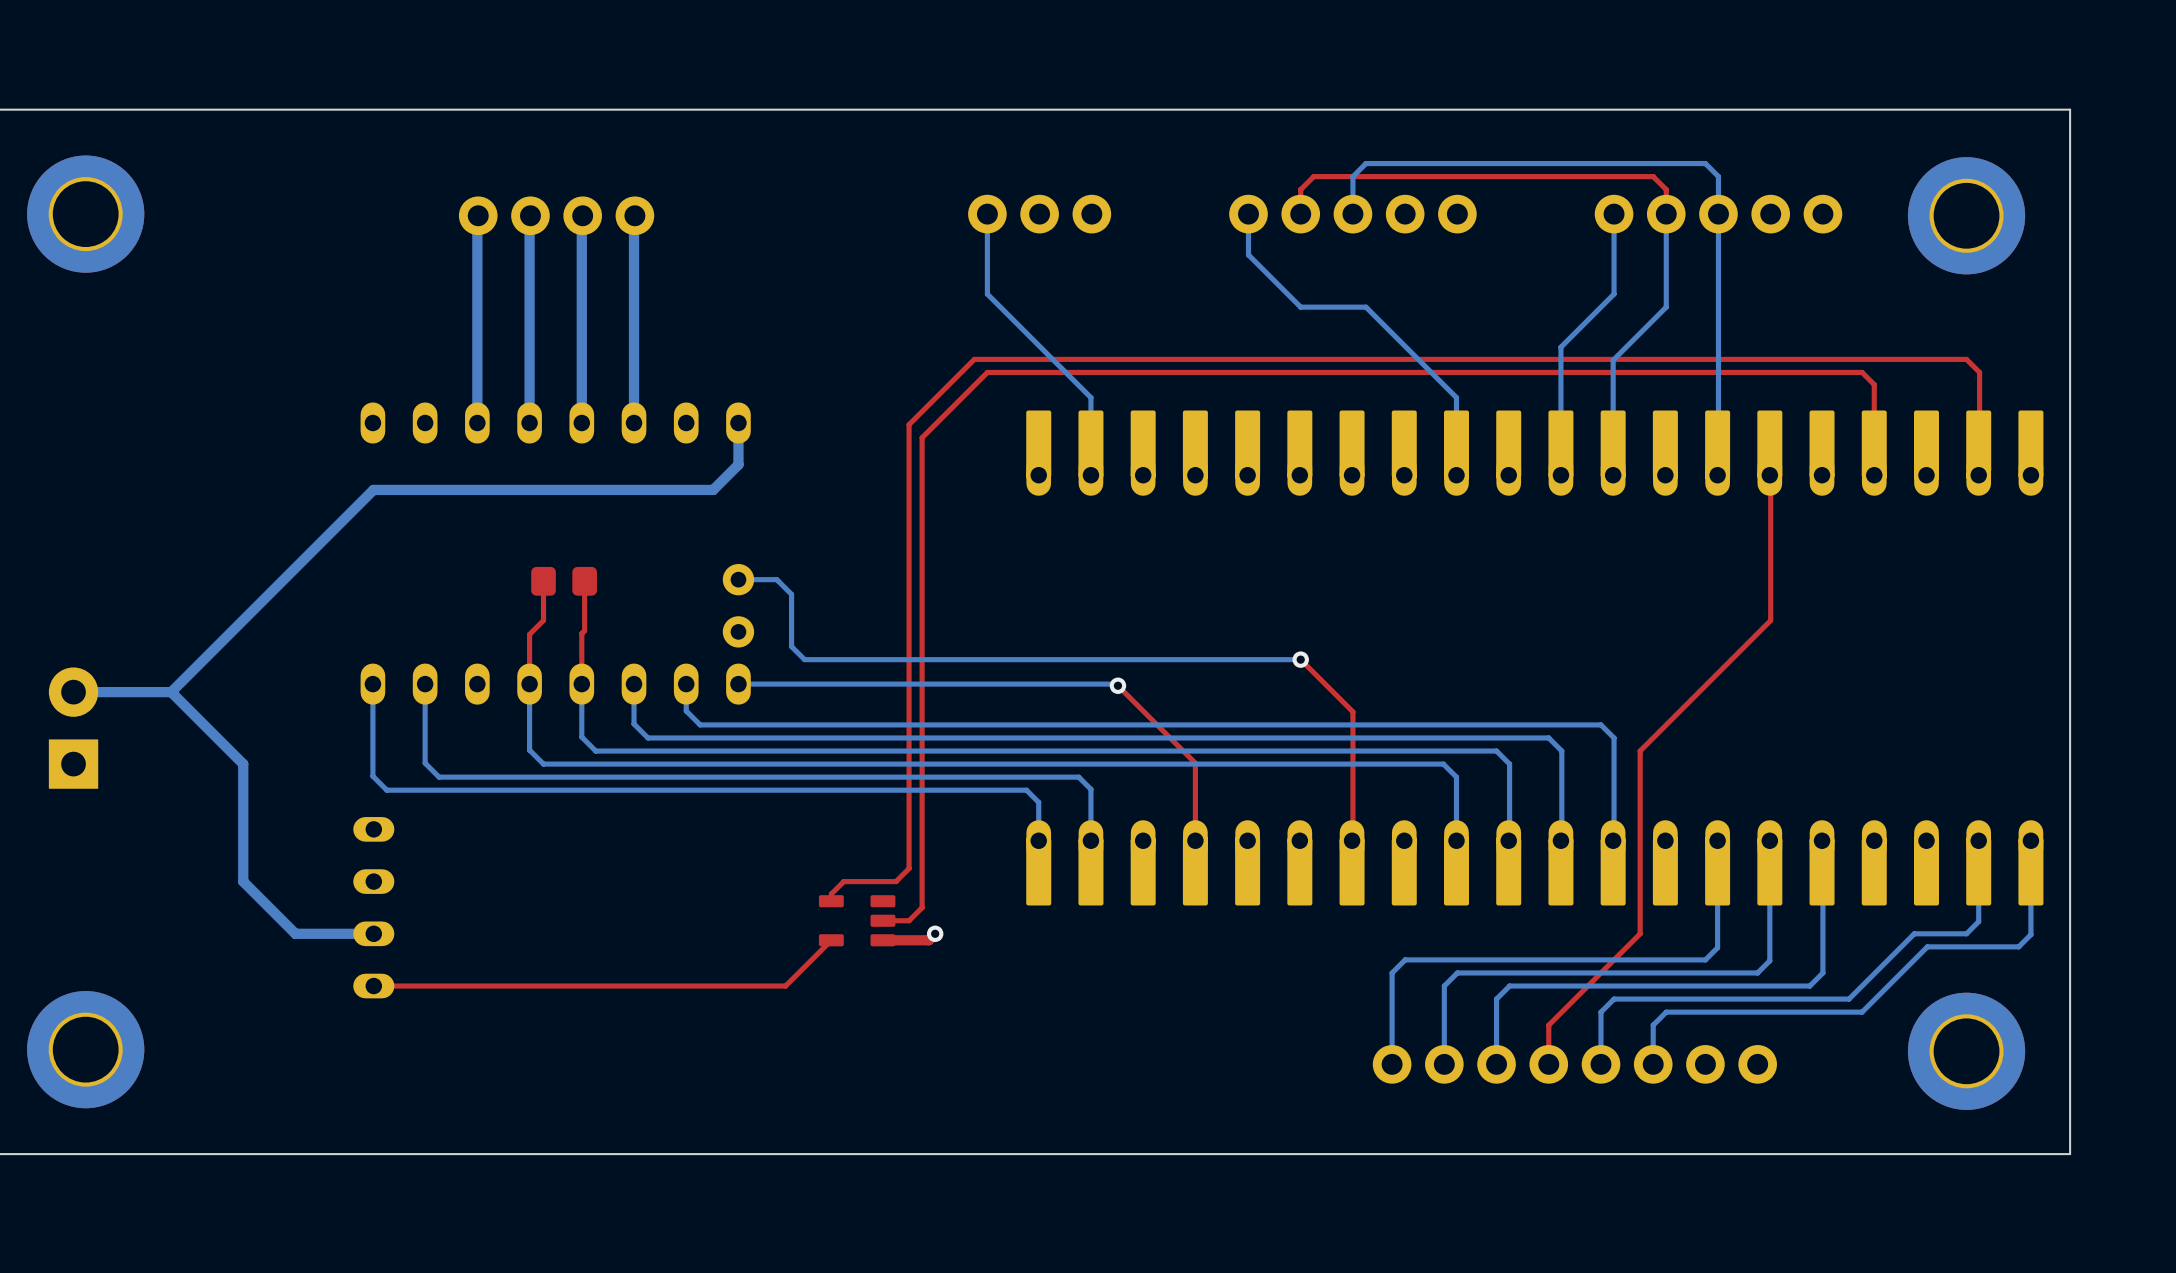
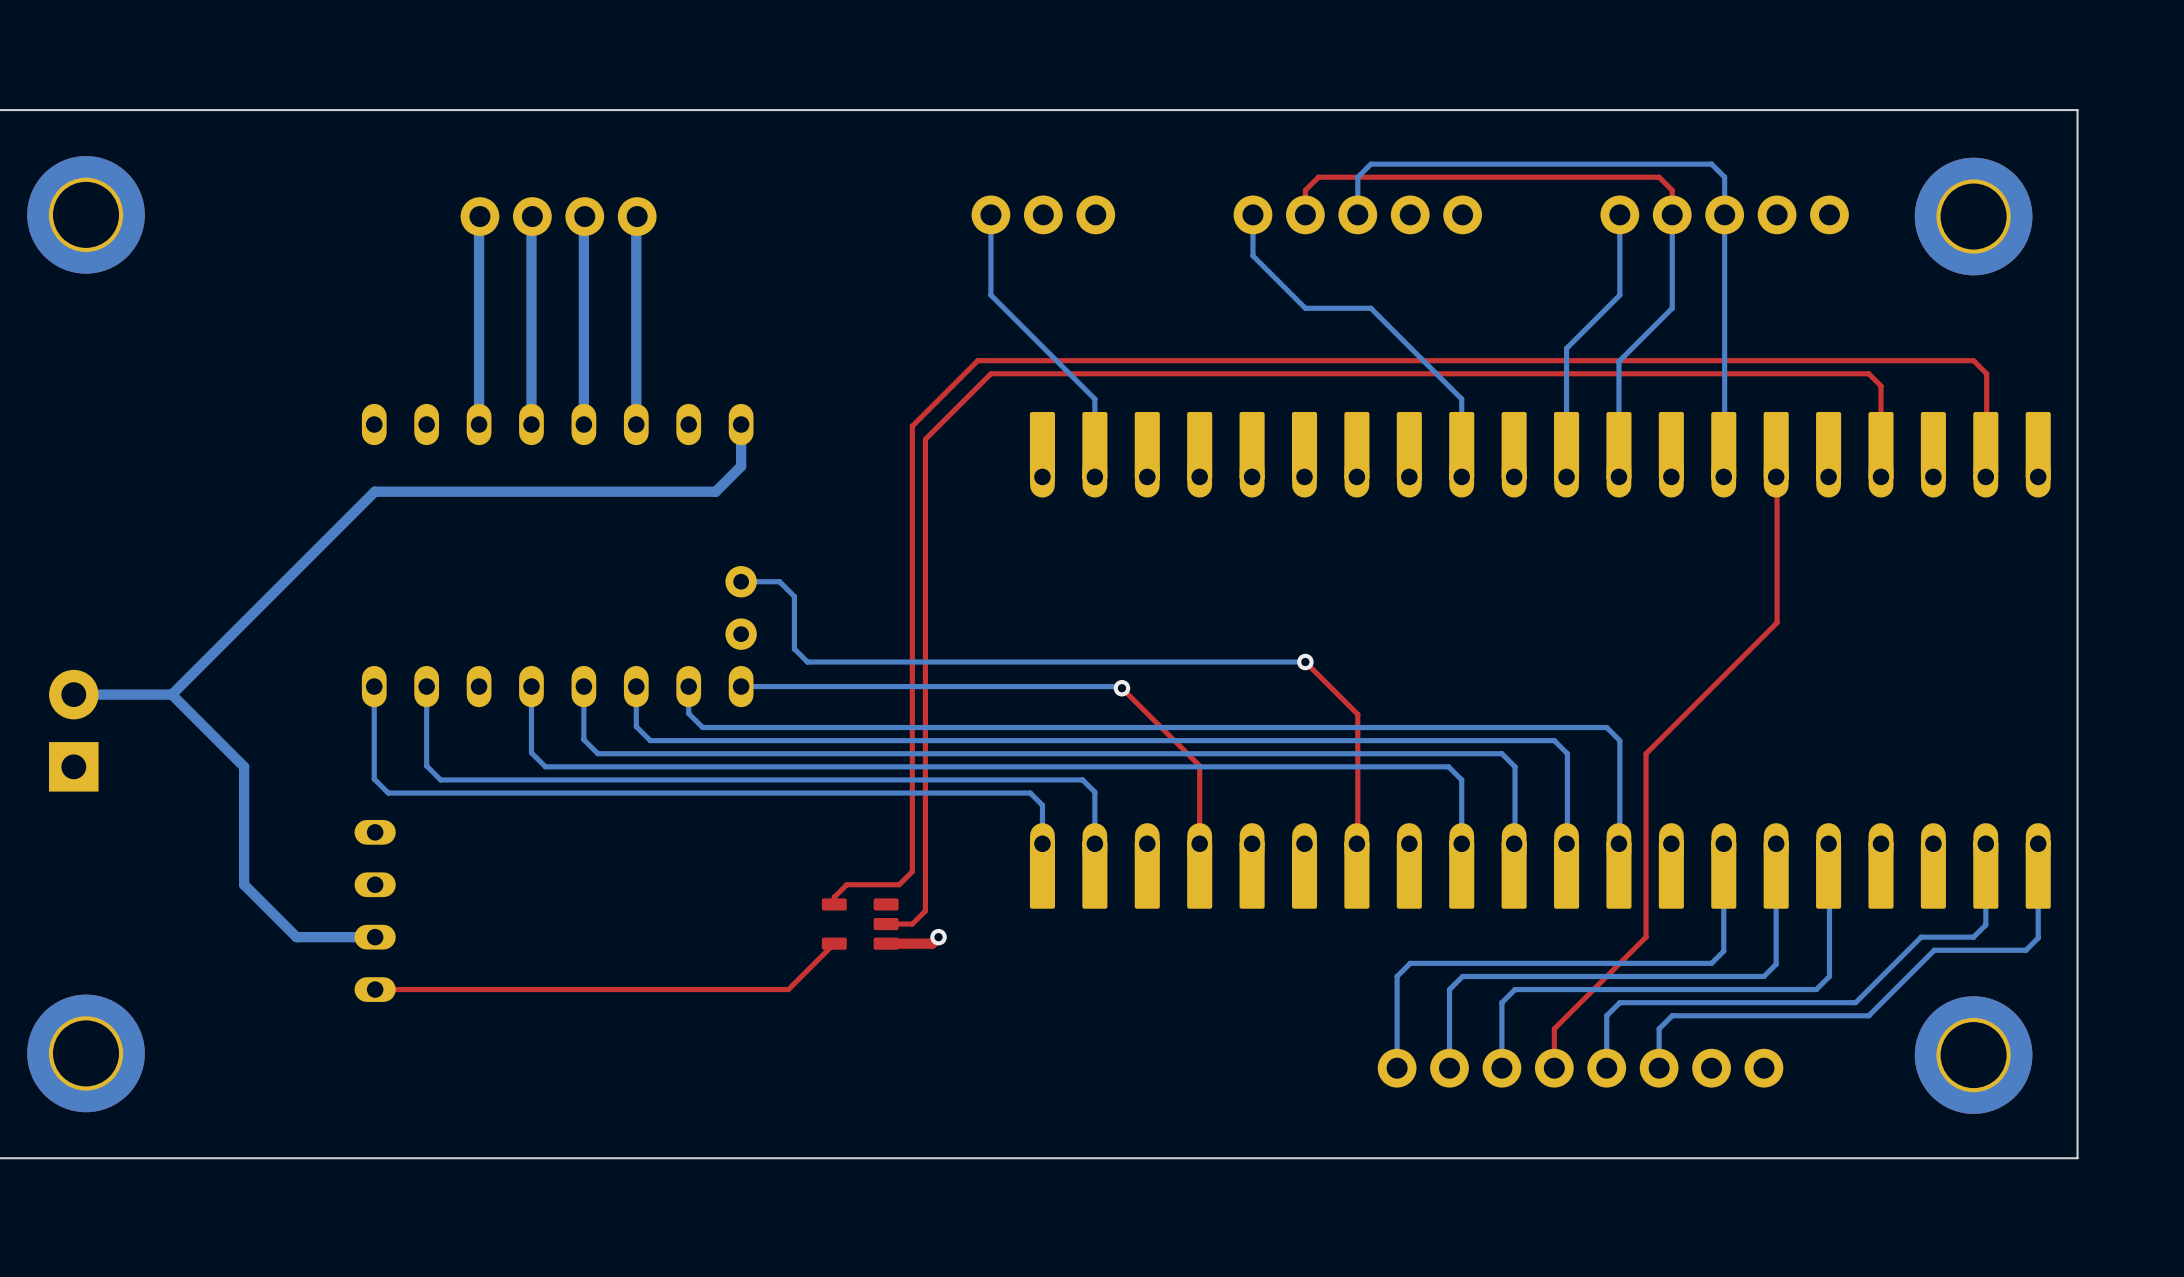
top track: (543, 581) (543, 620) (529, 634) (529, 684) -> none
part: (564, 581) -> none
top track: (584, 581) (581, 684) -> none

